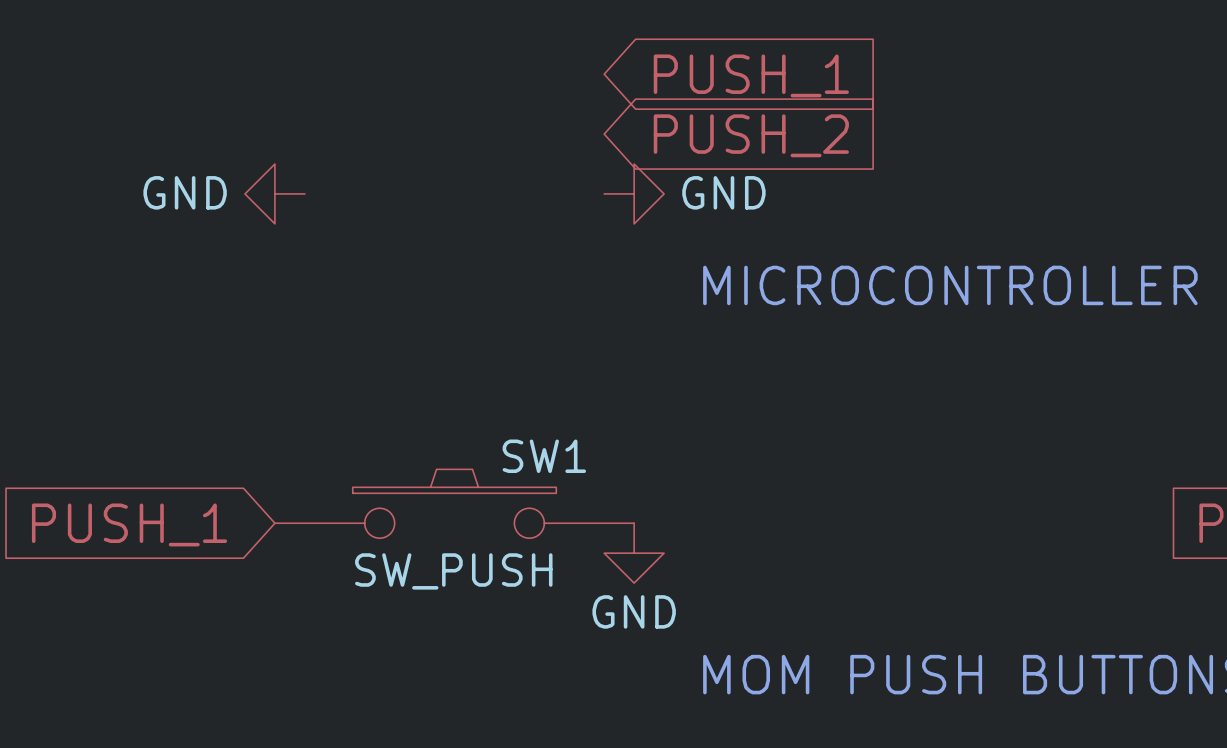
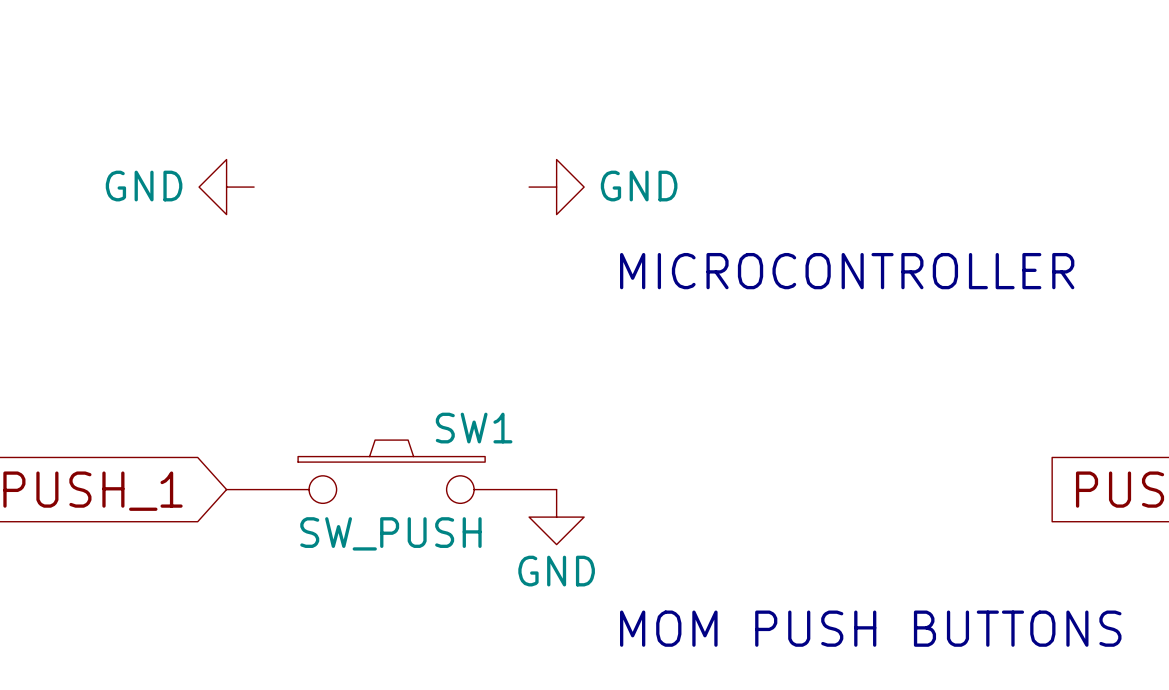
global label: PUSH_1 (751, 75) -> none
global label: PUSH_2 (751, 135) -> none

